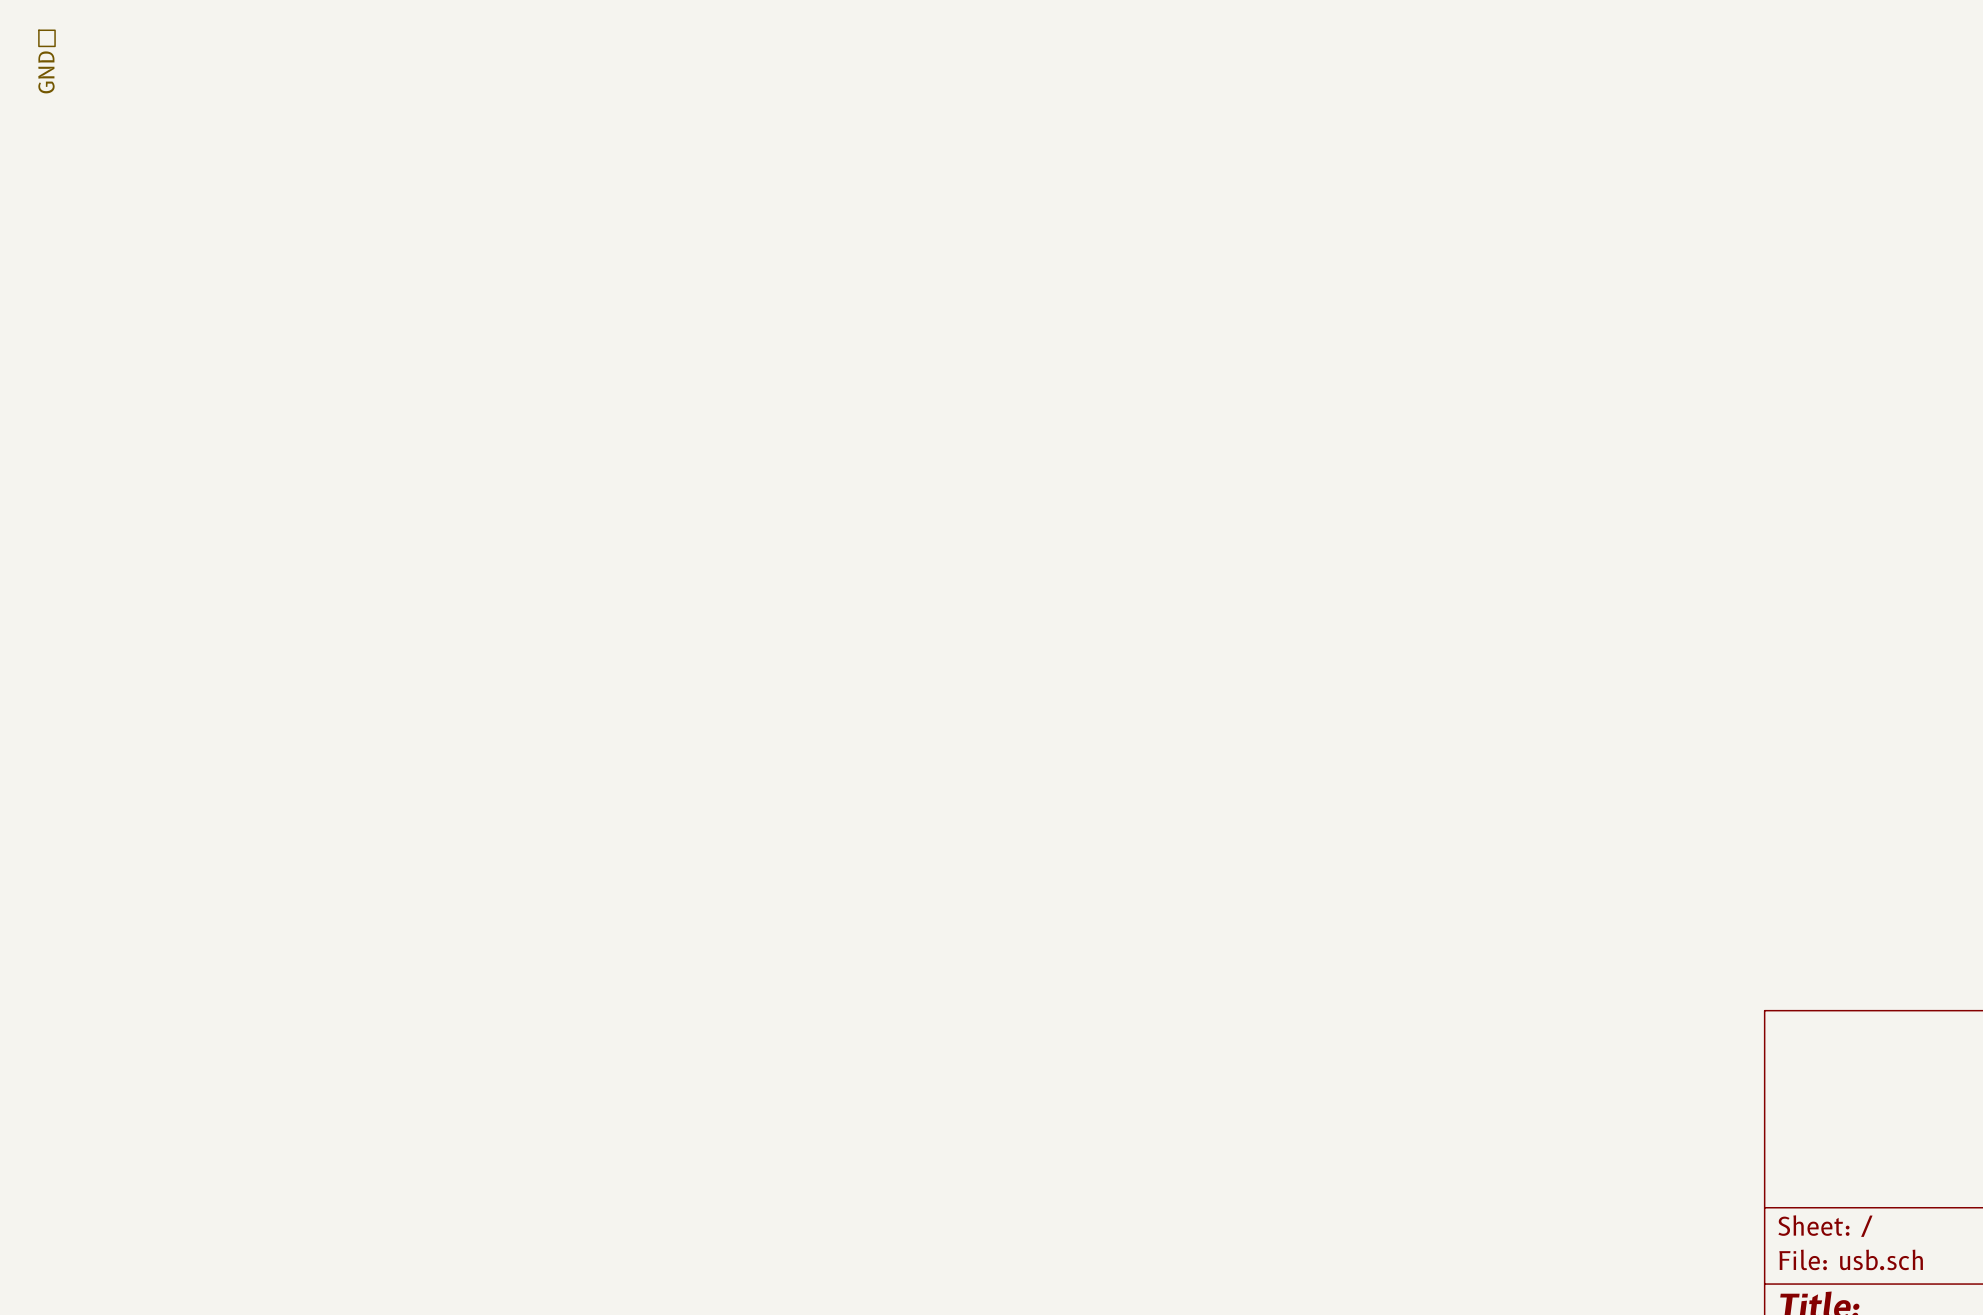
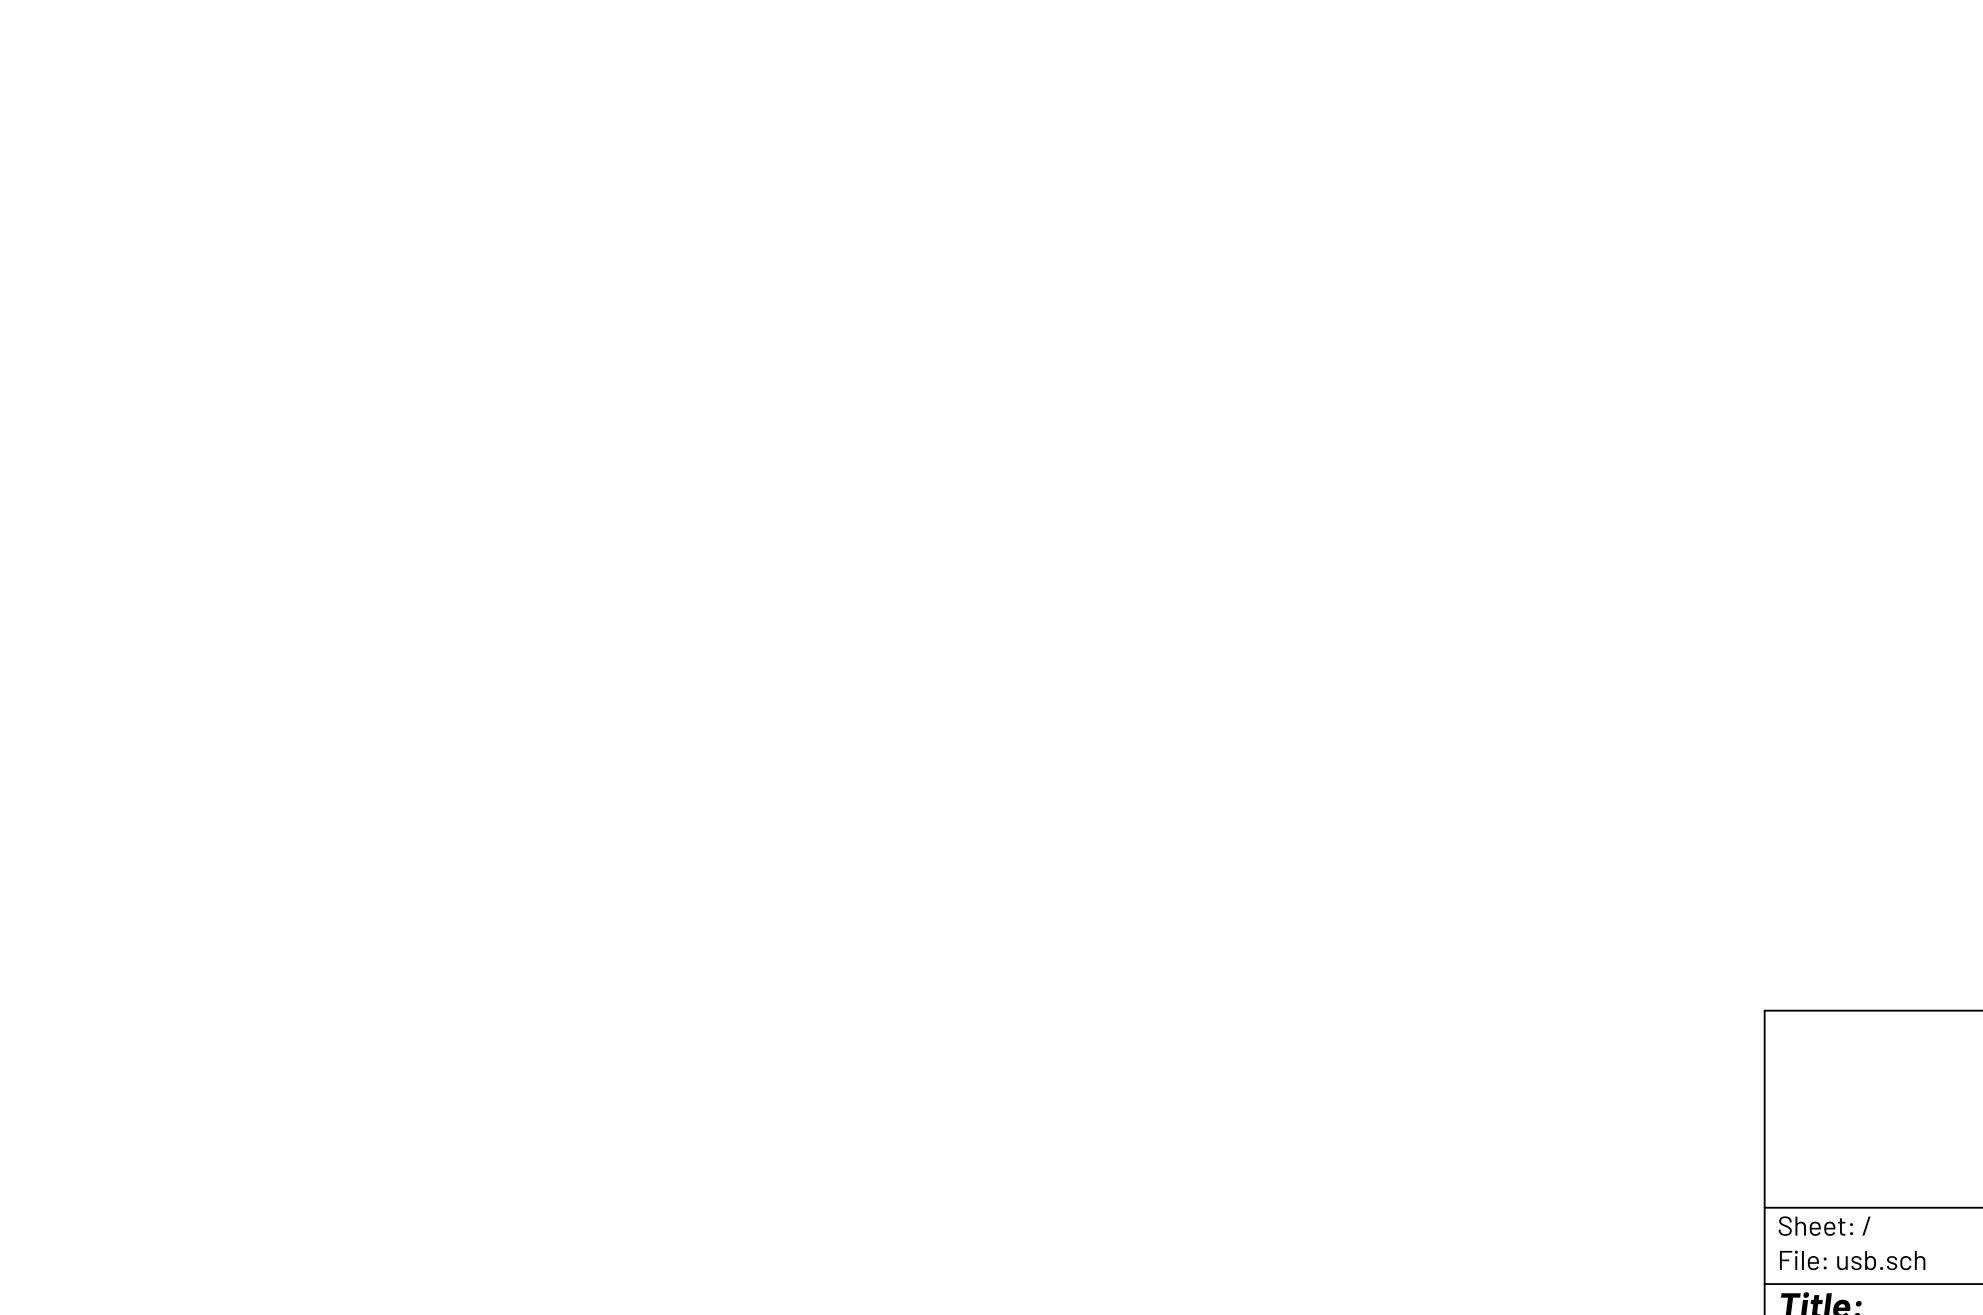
hierarchical label: GND (46, 72) -> none

